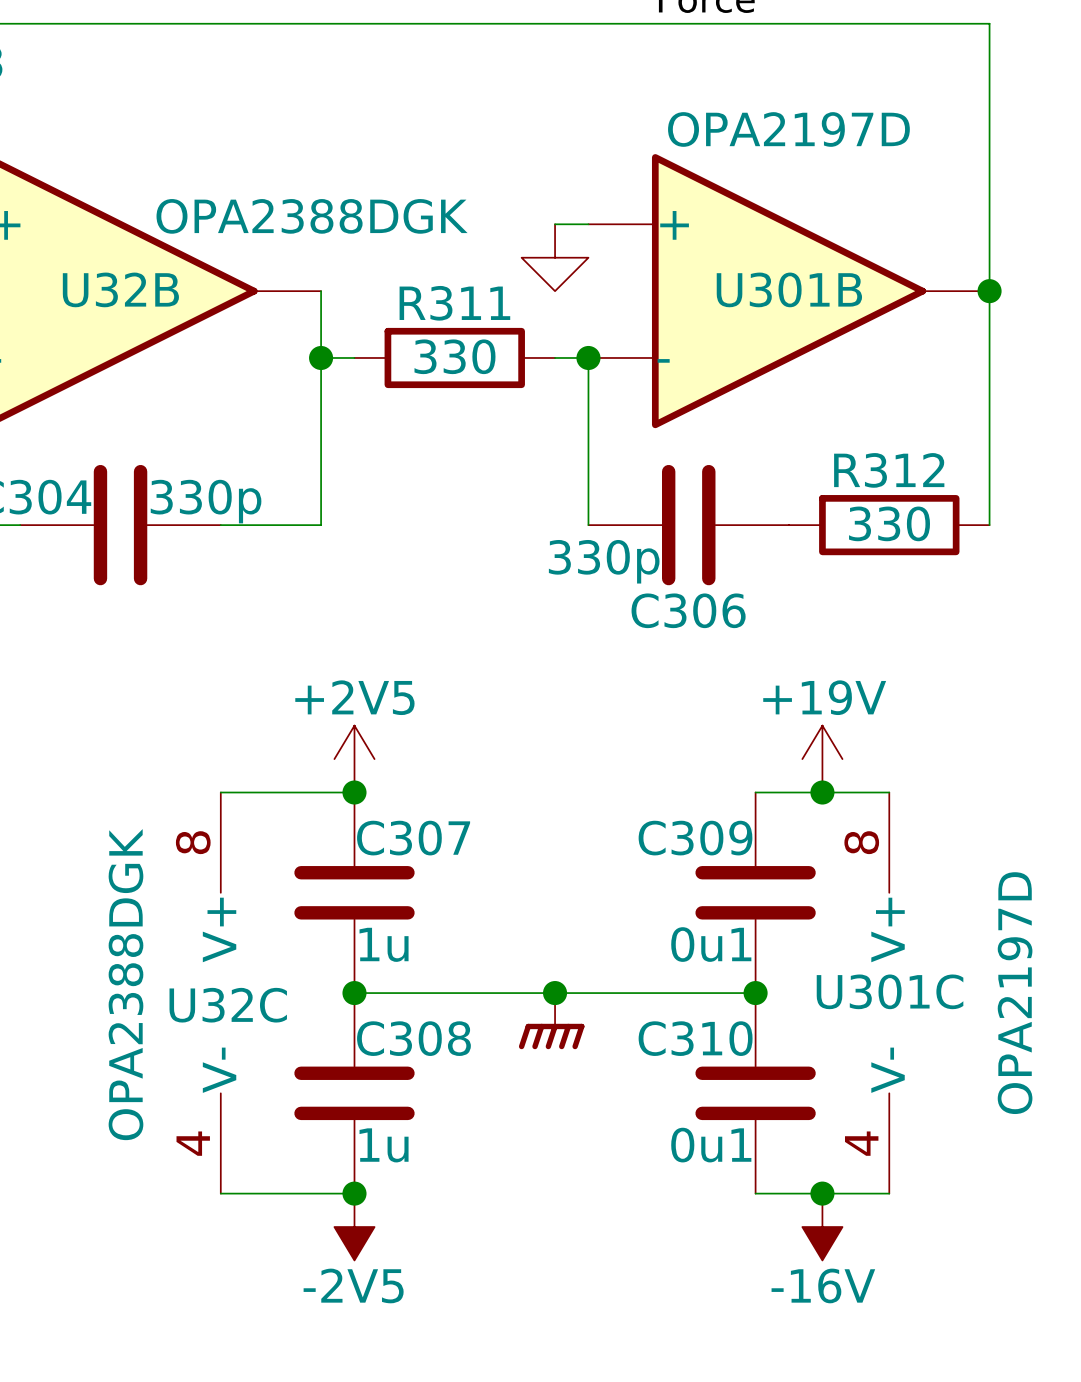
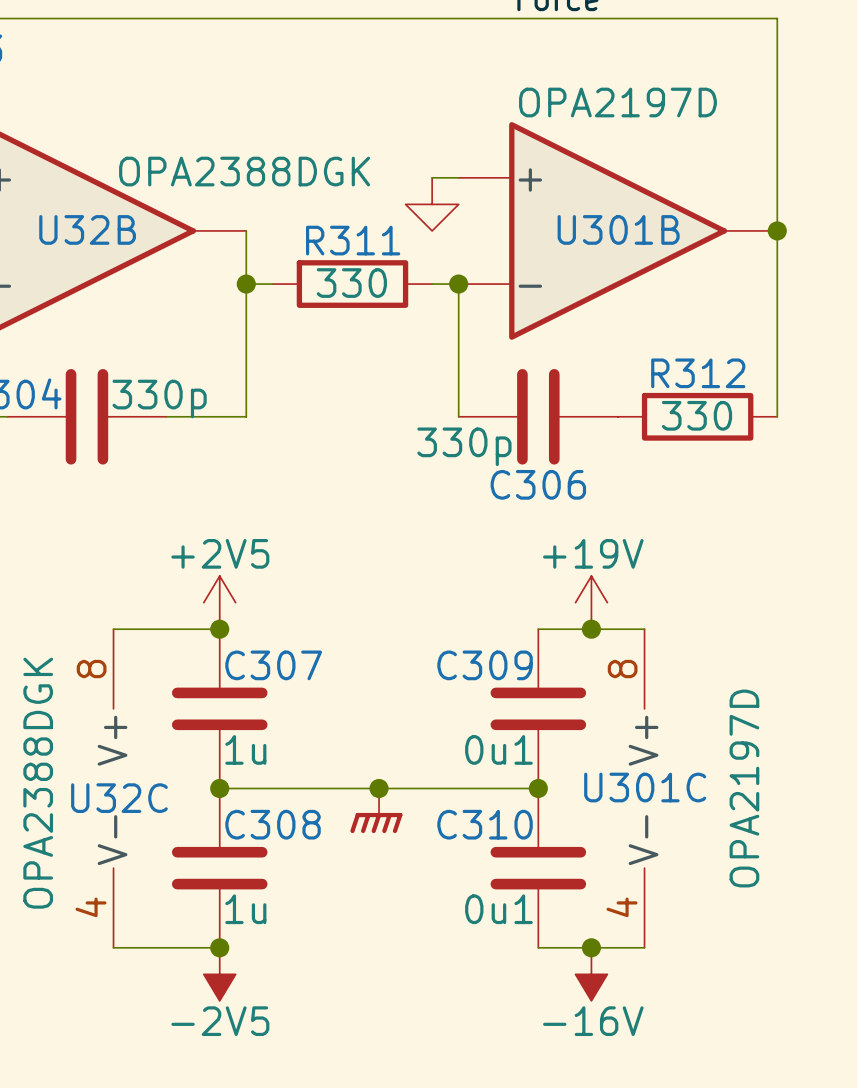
power symbol position: +2V5 (354, 759) -> +2V5 (219, 602)
power symbol position: +19V (822, 759) -> +19V (591, 602)
wire: (287, 792) (354, 792) -> (113, 629) (166, 629)
junction position: (354, 792) -> (219, 629)
wire: (822, 792) (889, 792) -> (538, 629) (591, 629)
junction position: (822, 792) -> (591, 629)
C307 position: (354, 892) -> (219, 708)
C309 position: (755, 892) -> (538, 708)
U32C position: (220, 993) -> (113, 788)
junction: none -> (219, 788)
junction: (354, 993) -> none
junction: none -> (379, 788)
junction: (555, 993) -> none
wire: (688, 993) (755, 993) -> (219, 788) (272, 788)
junction: none -> (538, 788)
junction: (755, 993) -> none
U301C position: (889, 993) -> (644, 788)
power symbol position: (551, 1021) -> (376, 810)
C308 position: (354, 1093) -> (219, 868)
C310 position: (755, 1093) -> (538, 868)
wire: (287, 1193) (354, 1193) -> (113, 947) (166, 947)
junction position: (354, 1193) -> (219, 947)
wire: (822, 1193) (889, 1193) -> (538, 947) (591, 947)
junction position: (822, 1193) -> (591, 947)
power symbol position: -2V5 (354, 1227) -> -2V5 (219, 974)
power symbol position: -16V (822, 1227) -> -16V (591, 974)

